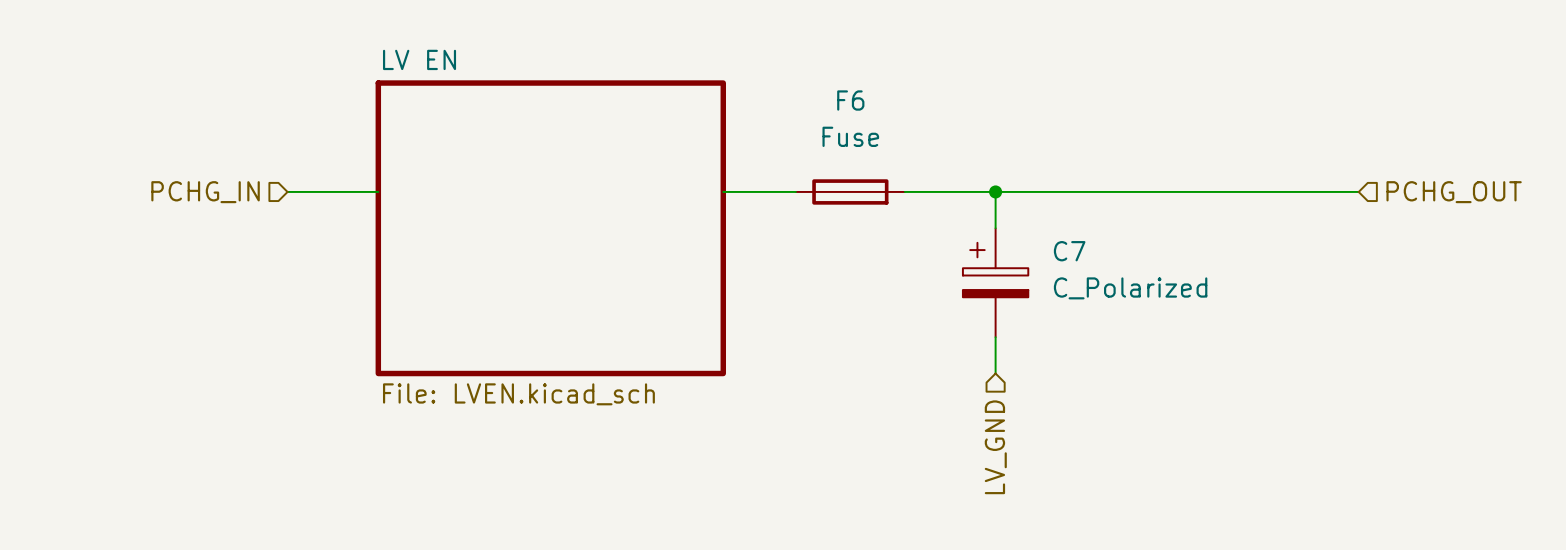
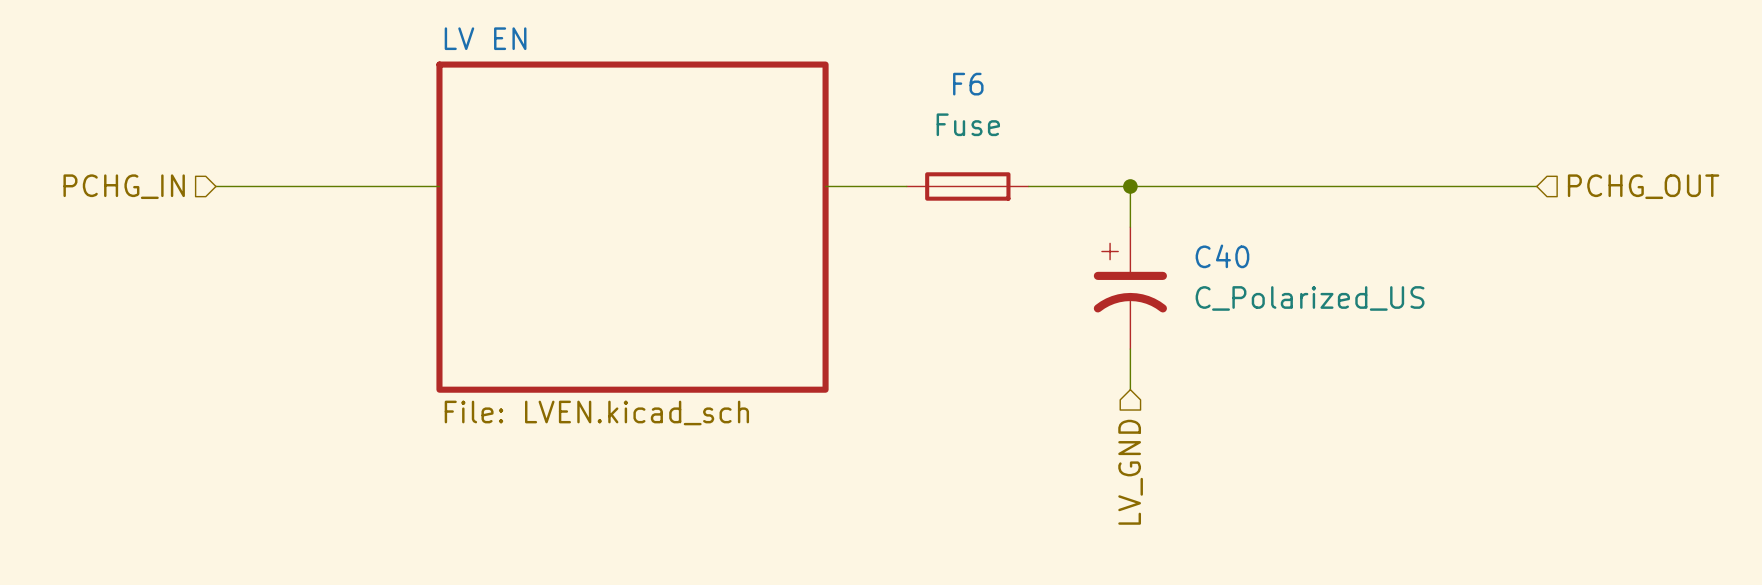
wire: none -> (215, 186) (337, 186)
hierarchical label position: PCHG_IN (205, 192) -> PCHG_IN (124, 186)
C7: C_Polarized (995, 282) -> none
C40: none -> C_Polarized_US (1130, 288)

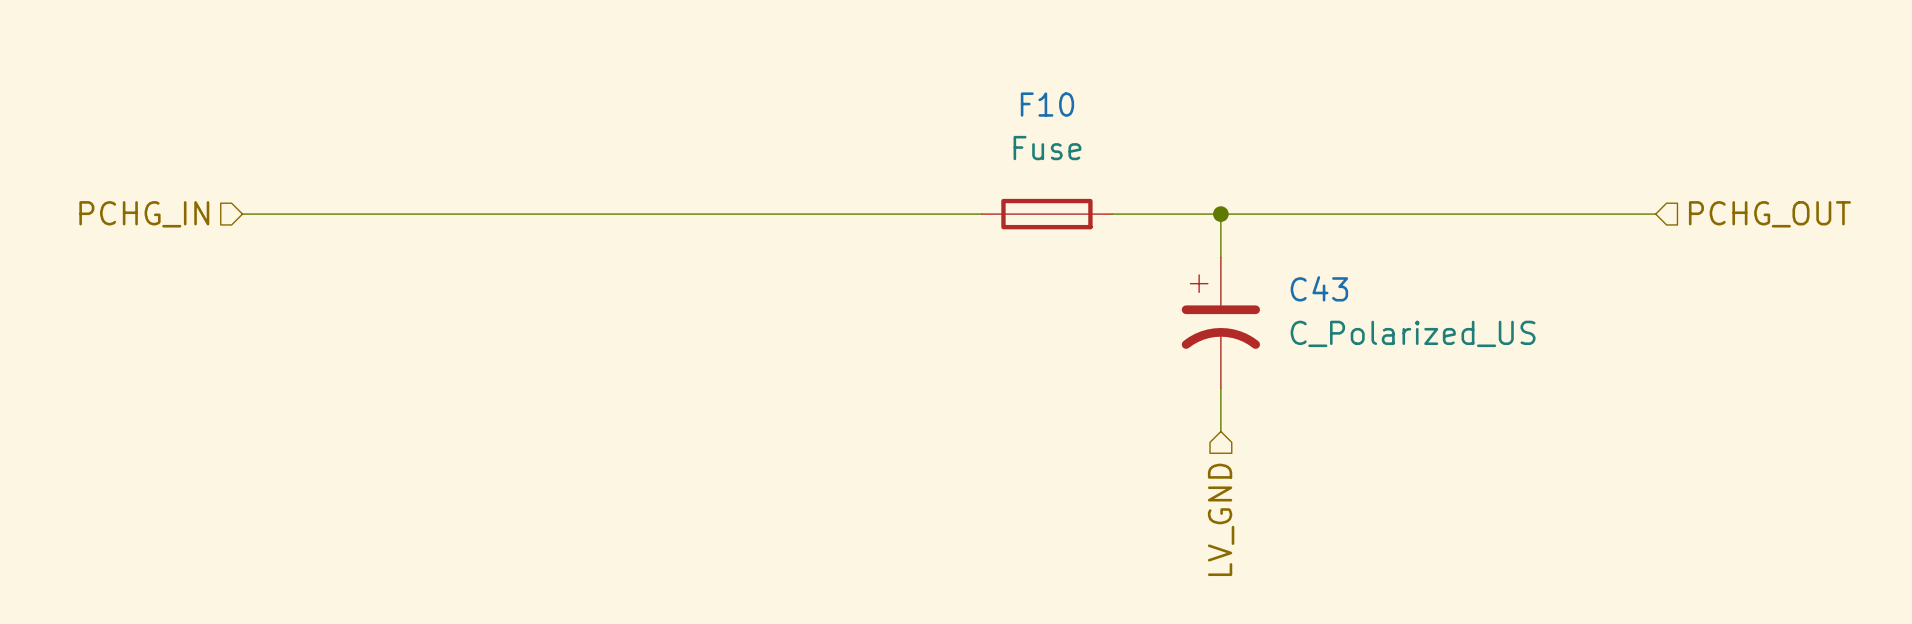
F6 name: F6 (968, 84) -> F10 (1047, 104)
wire: none -> (481, 214) (894, 214)
sheet LV EN: File: LVEN.kicad_sch (632, 227) -> none
C40 name: C40 (1222, 256) -> C43 (1319, 288)

